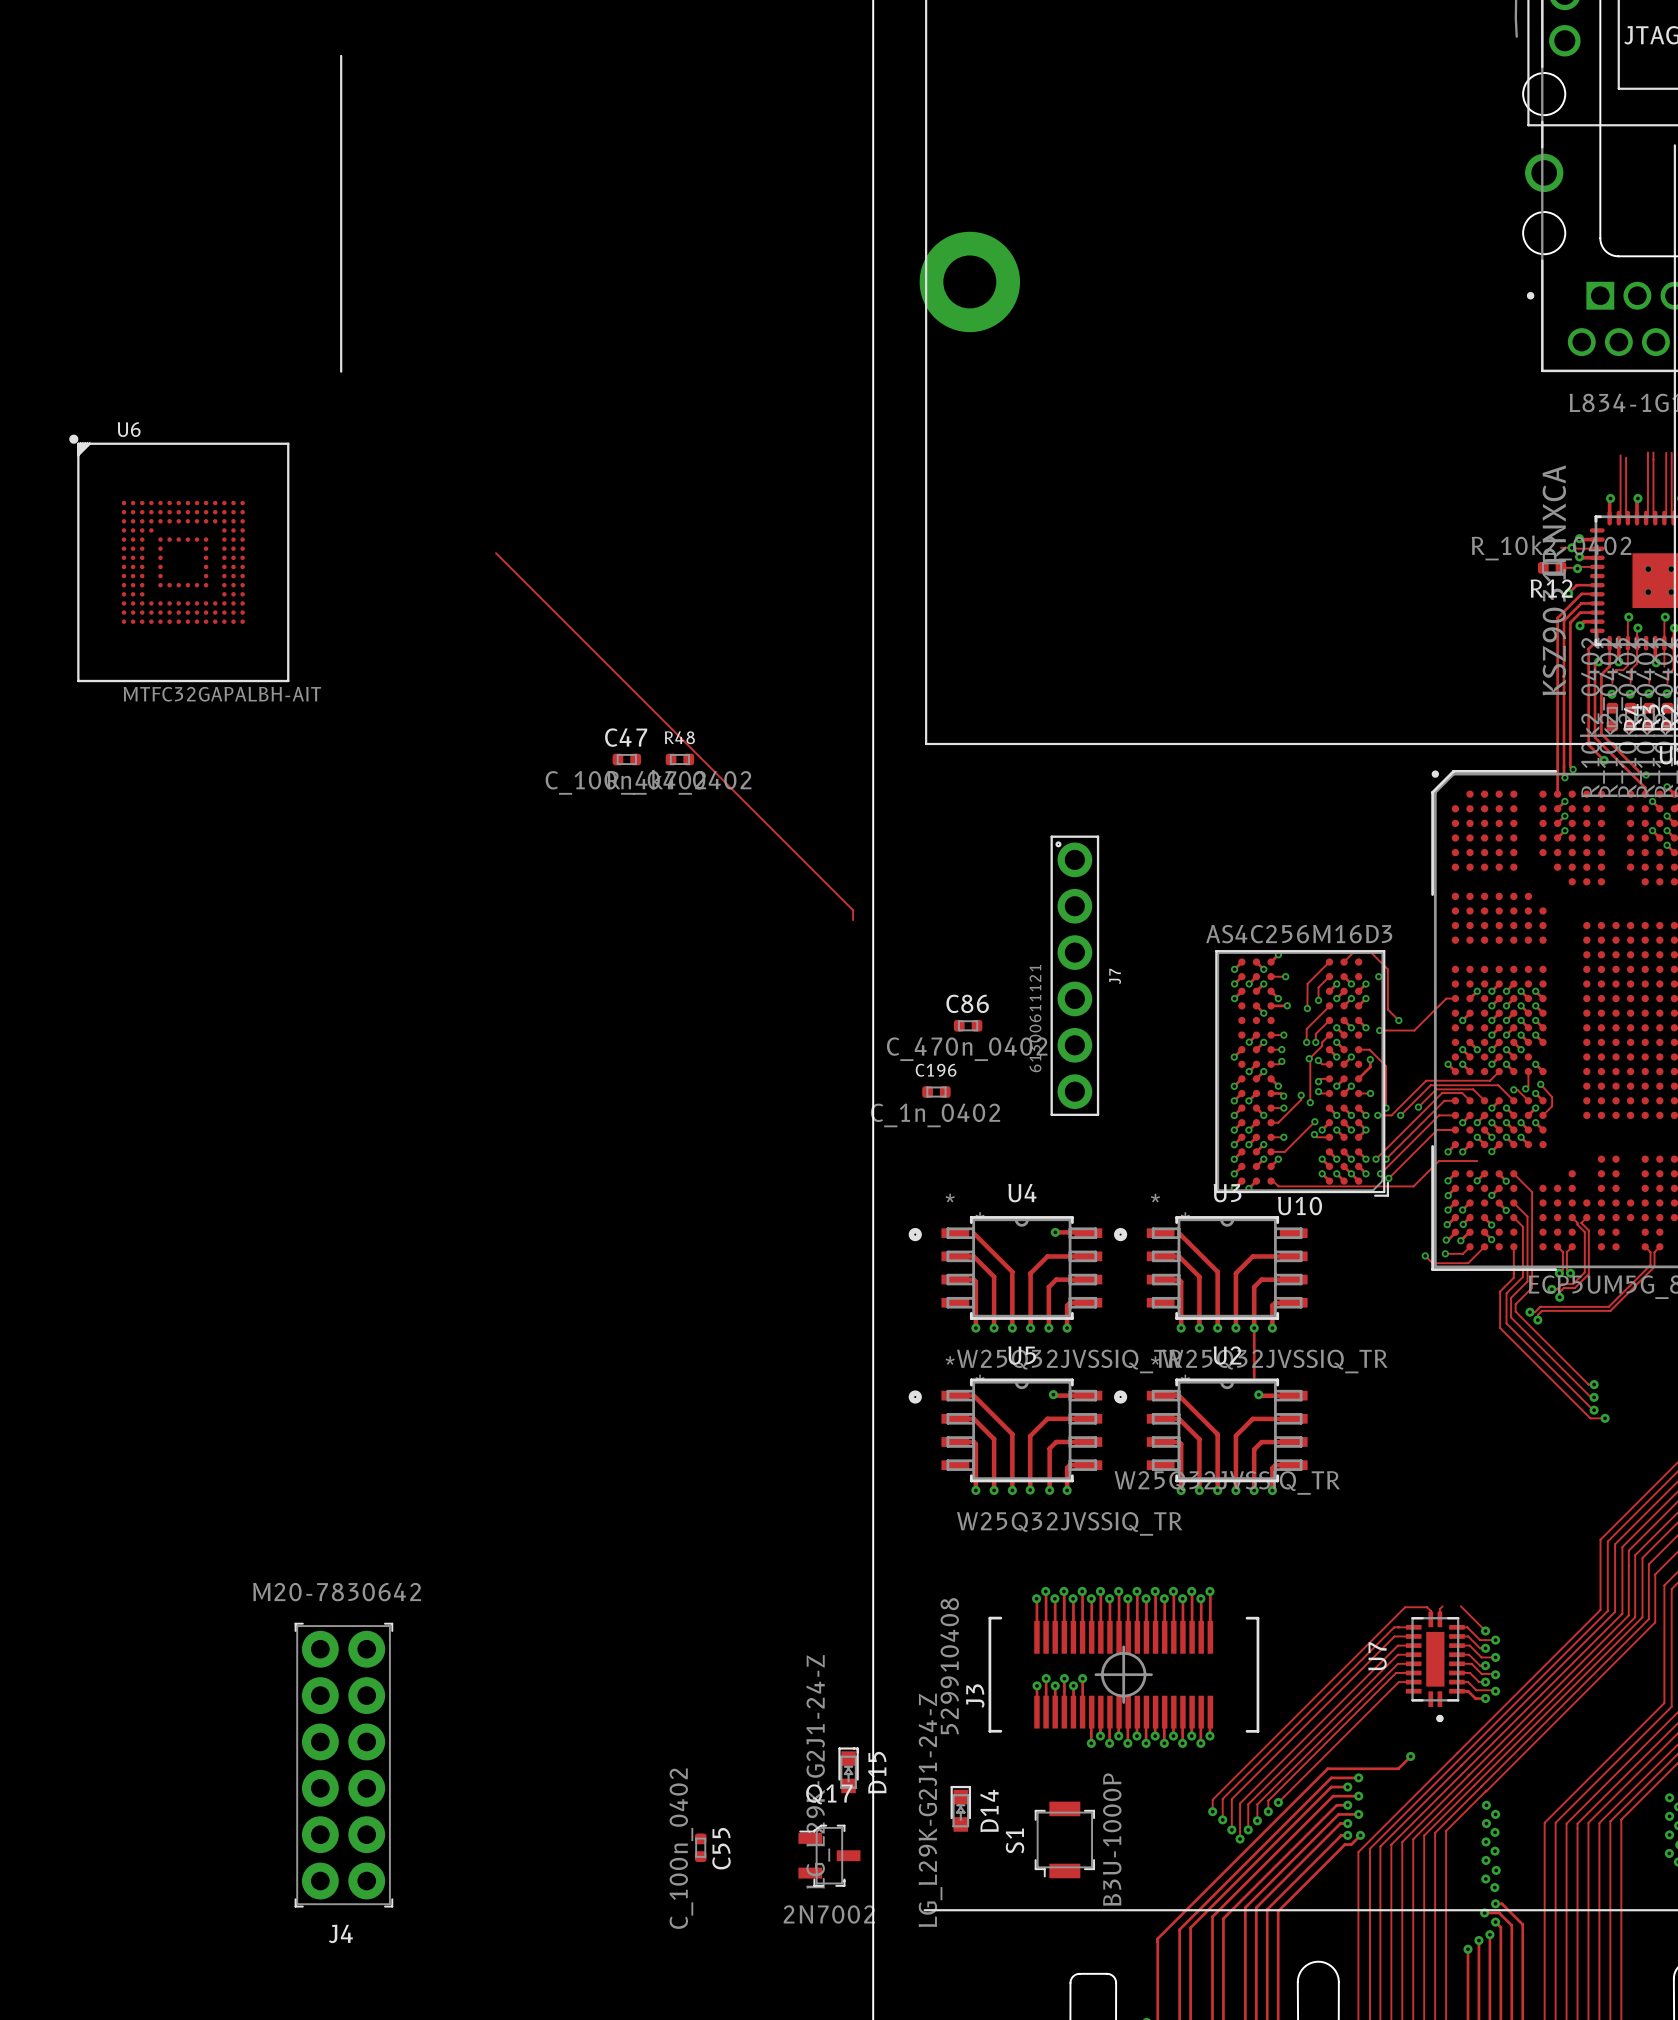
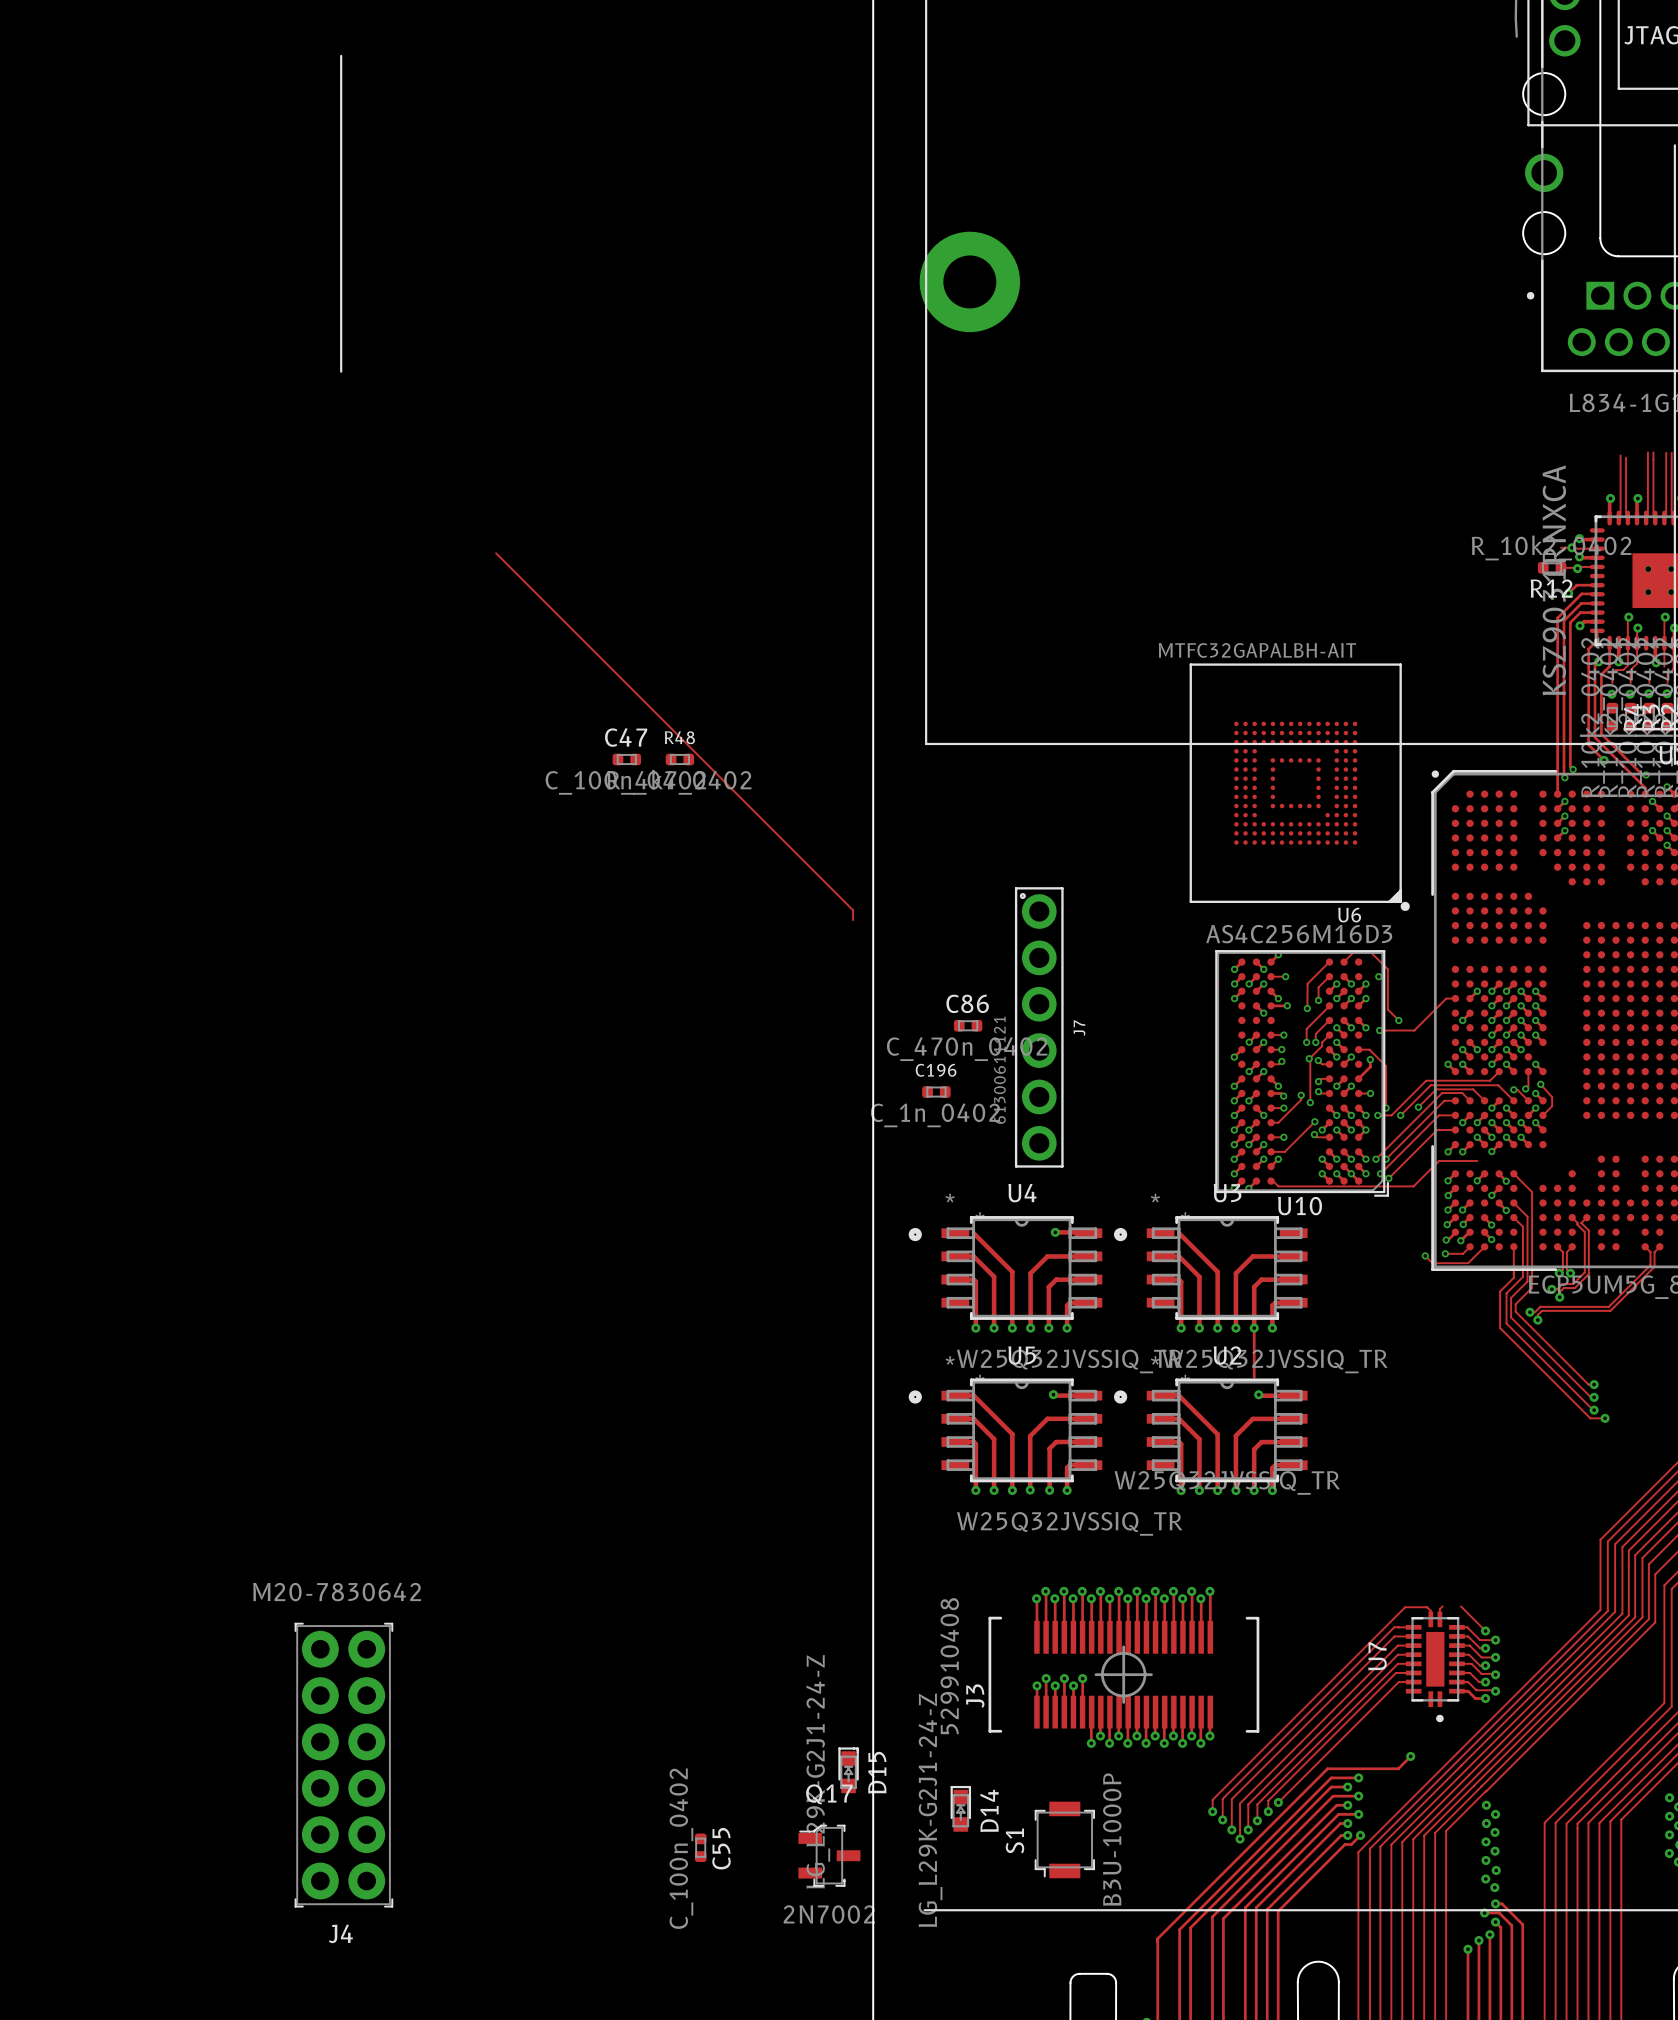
U6 rotation: 0° (179, 558) -> 180° (1299, 787)
U6 position: (179, 558) -> (1299, 787)
J7 position: (1074, 975) -> (1039, 1027)

